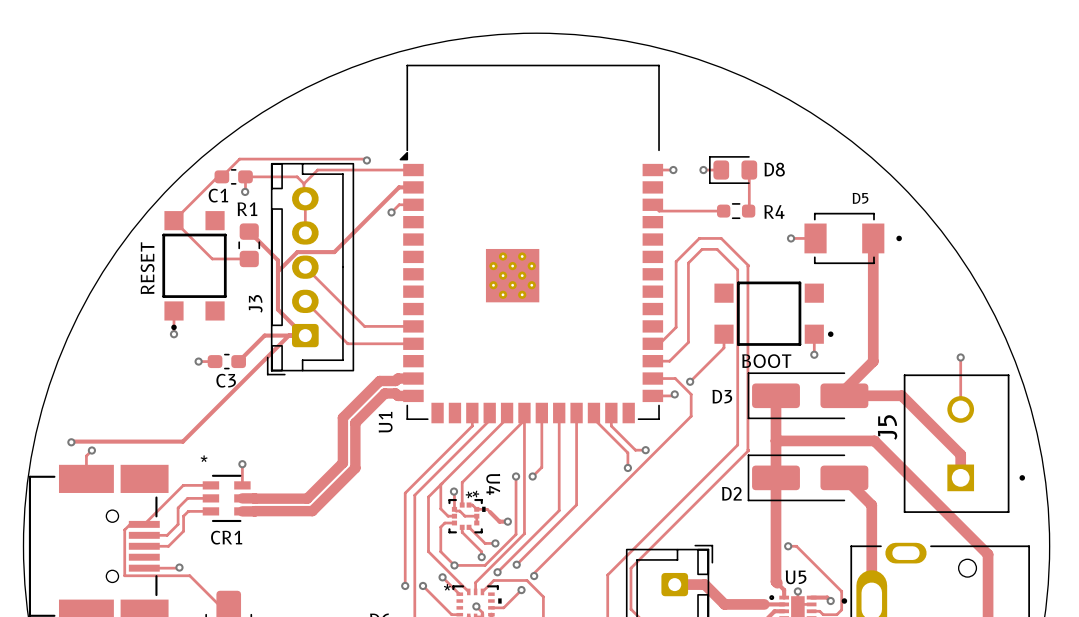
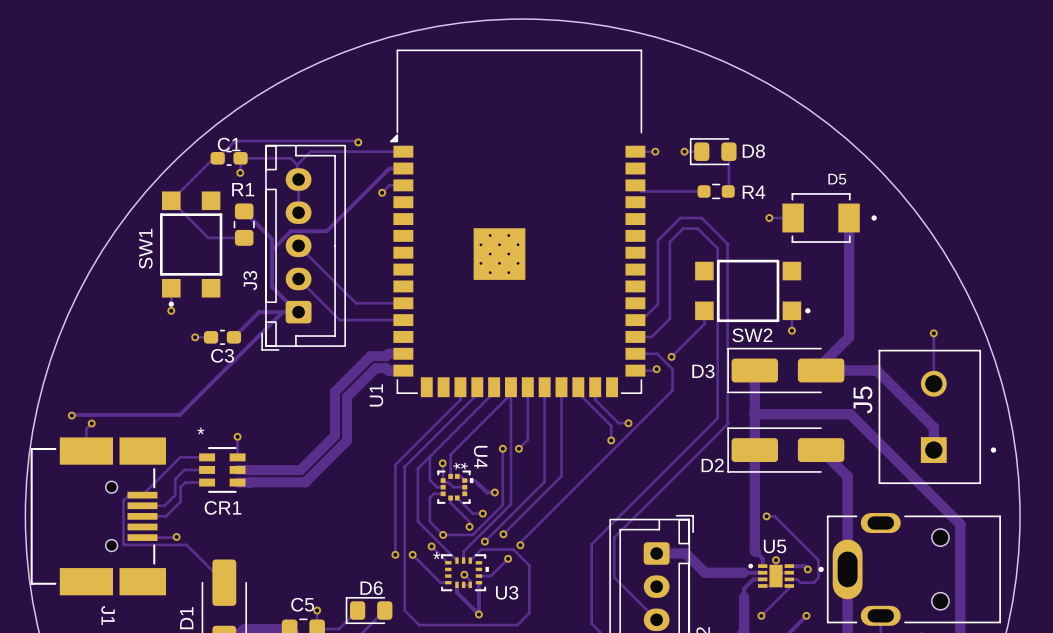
C1 name position: C1 (218, 195) -> C1 (229, 144)
RESET name: RESET (147, 268) -> SW1 (145, 248)
BOOT name: BOOT (766, 361) -> SW2 (752, 335)

